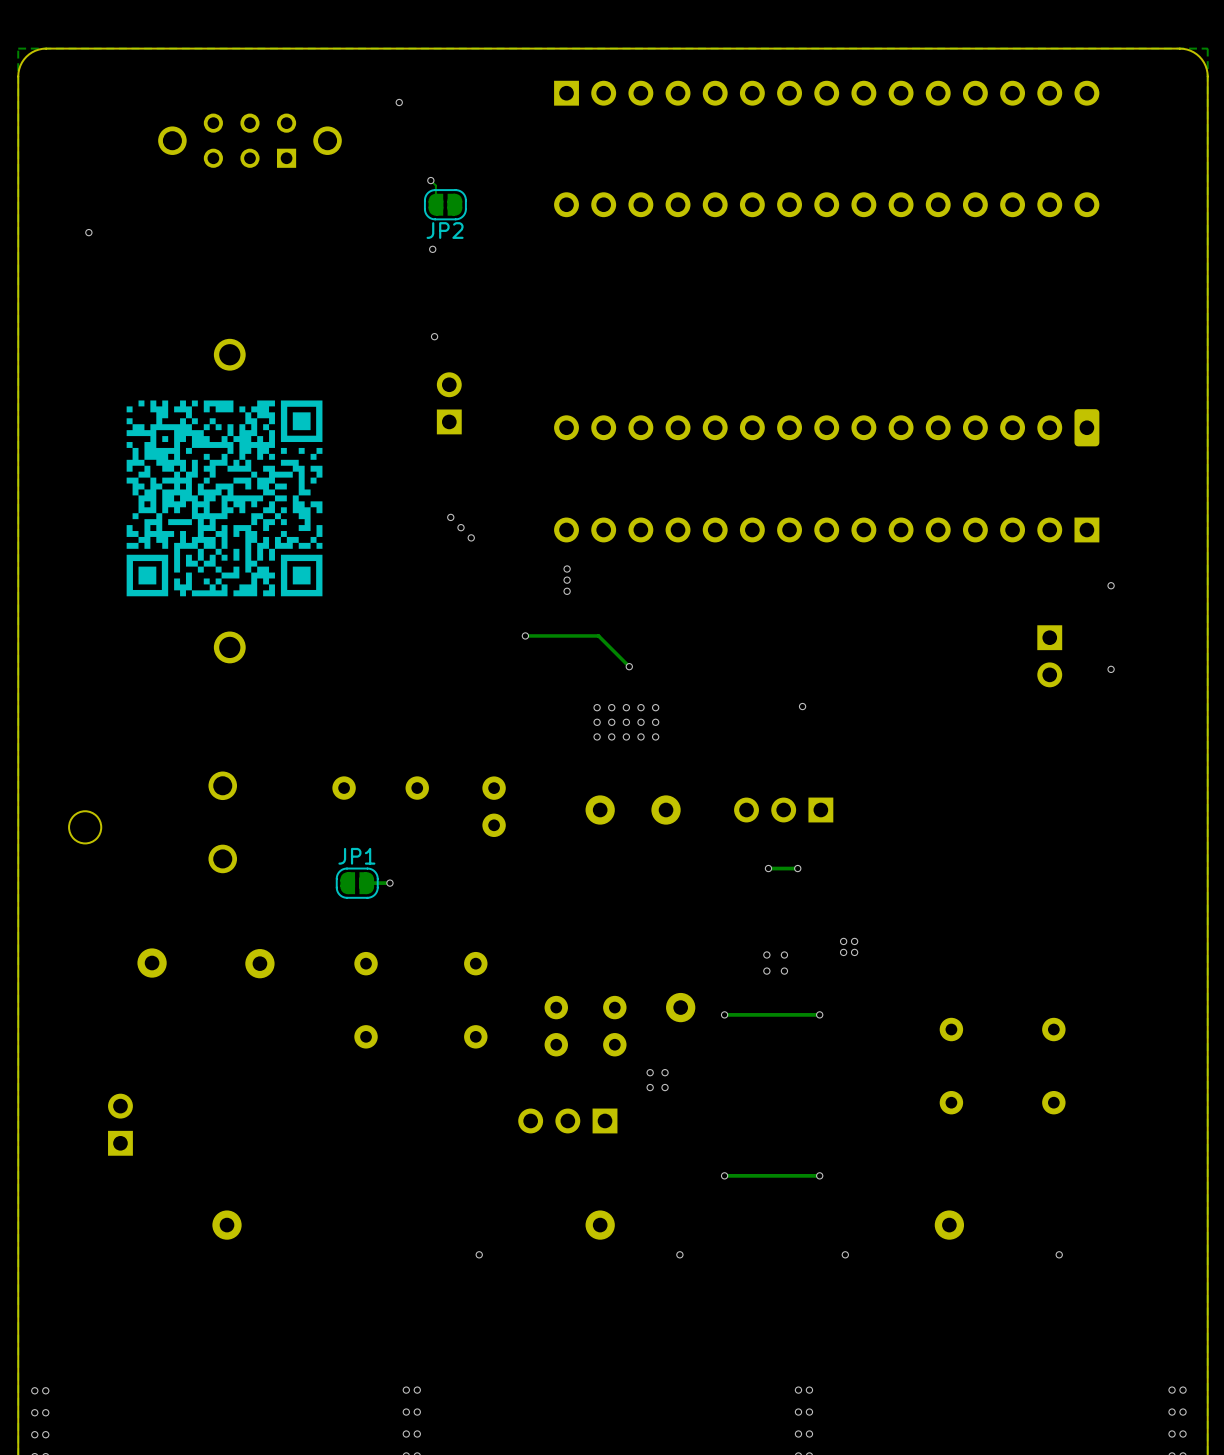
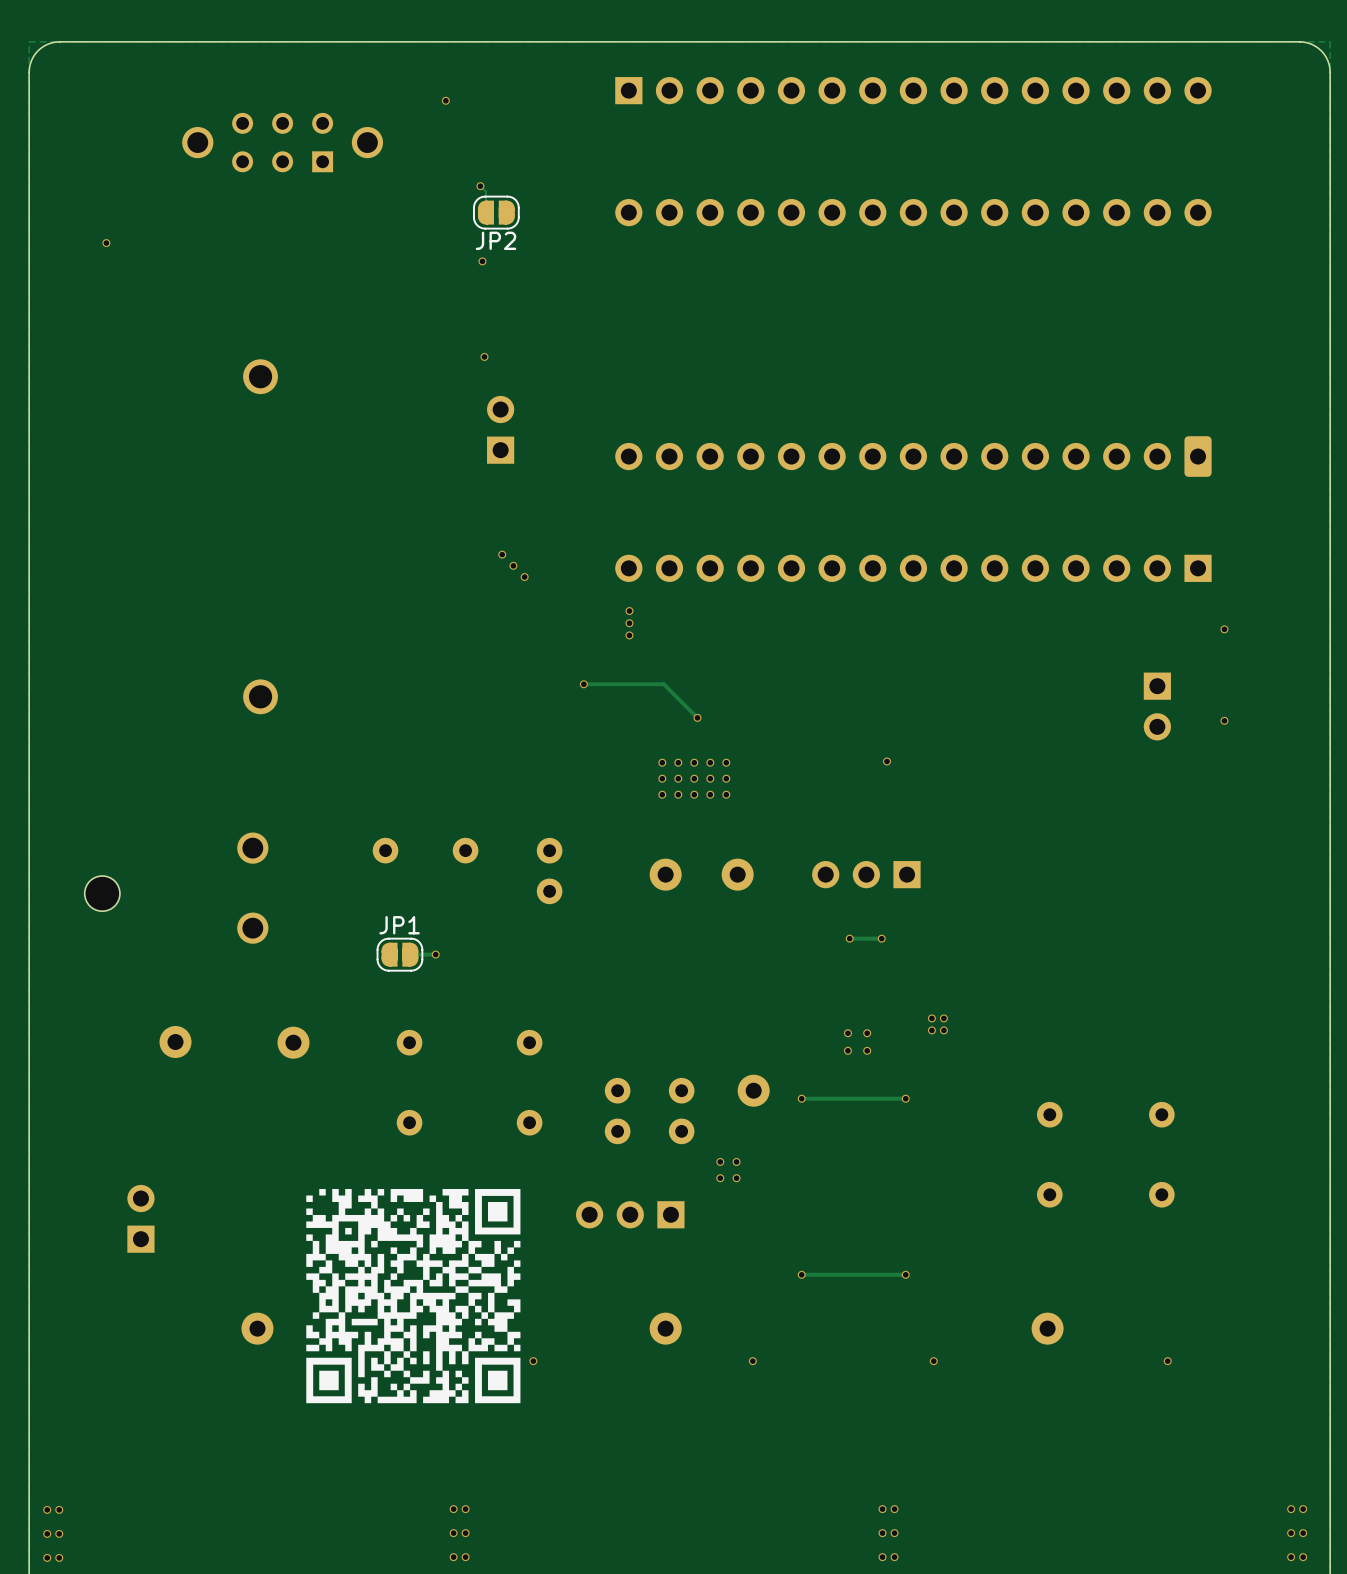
drawing: [126, 400, 323, 597] -> none
drawing: none -> [306, 1189, 521, 1404]

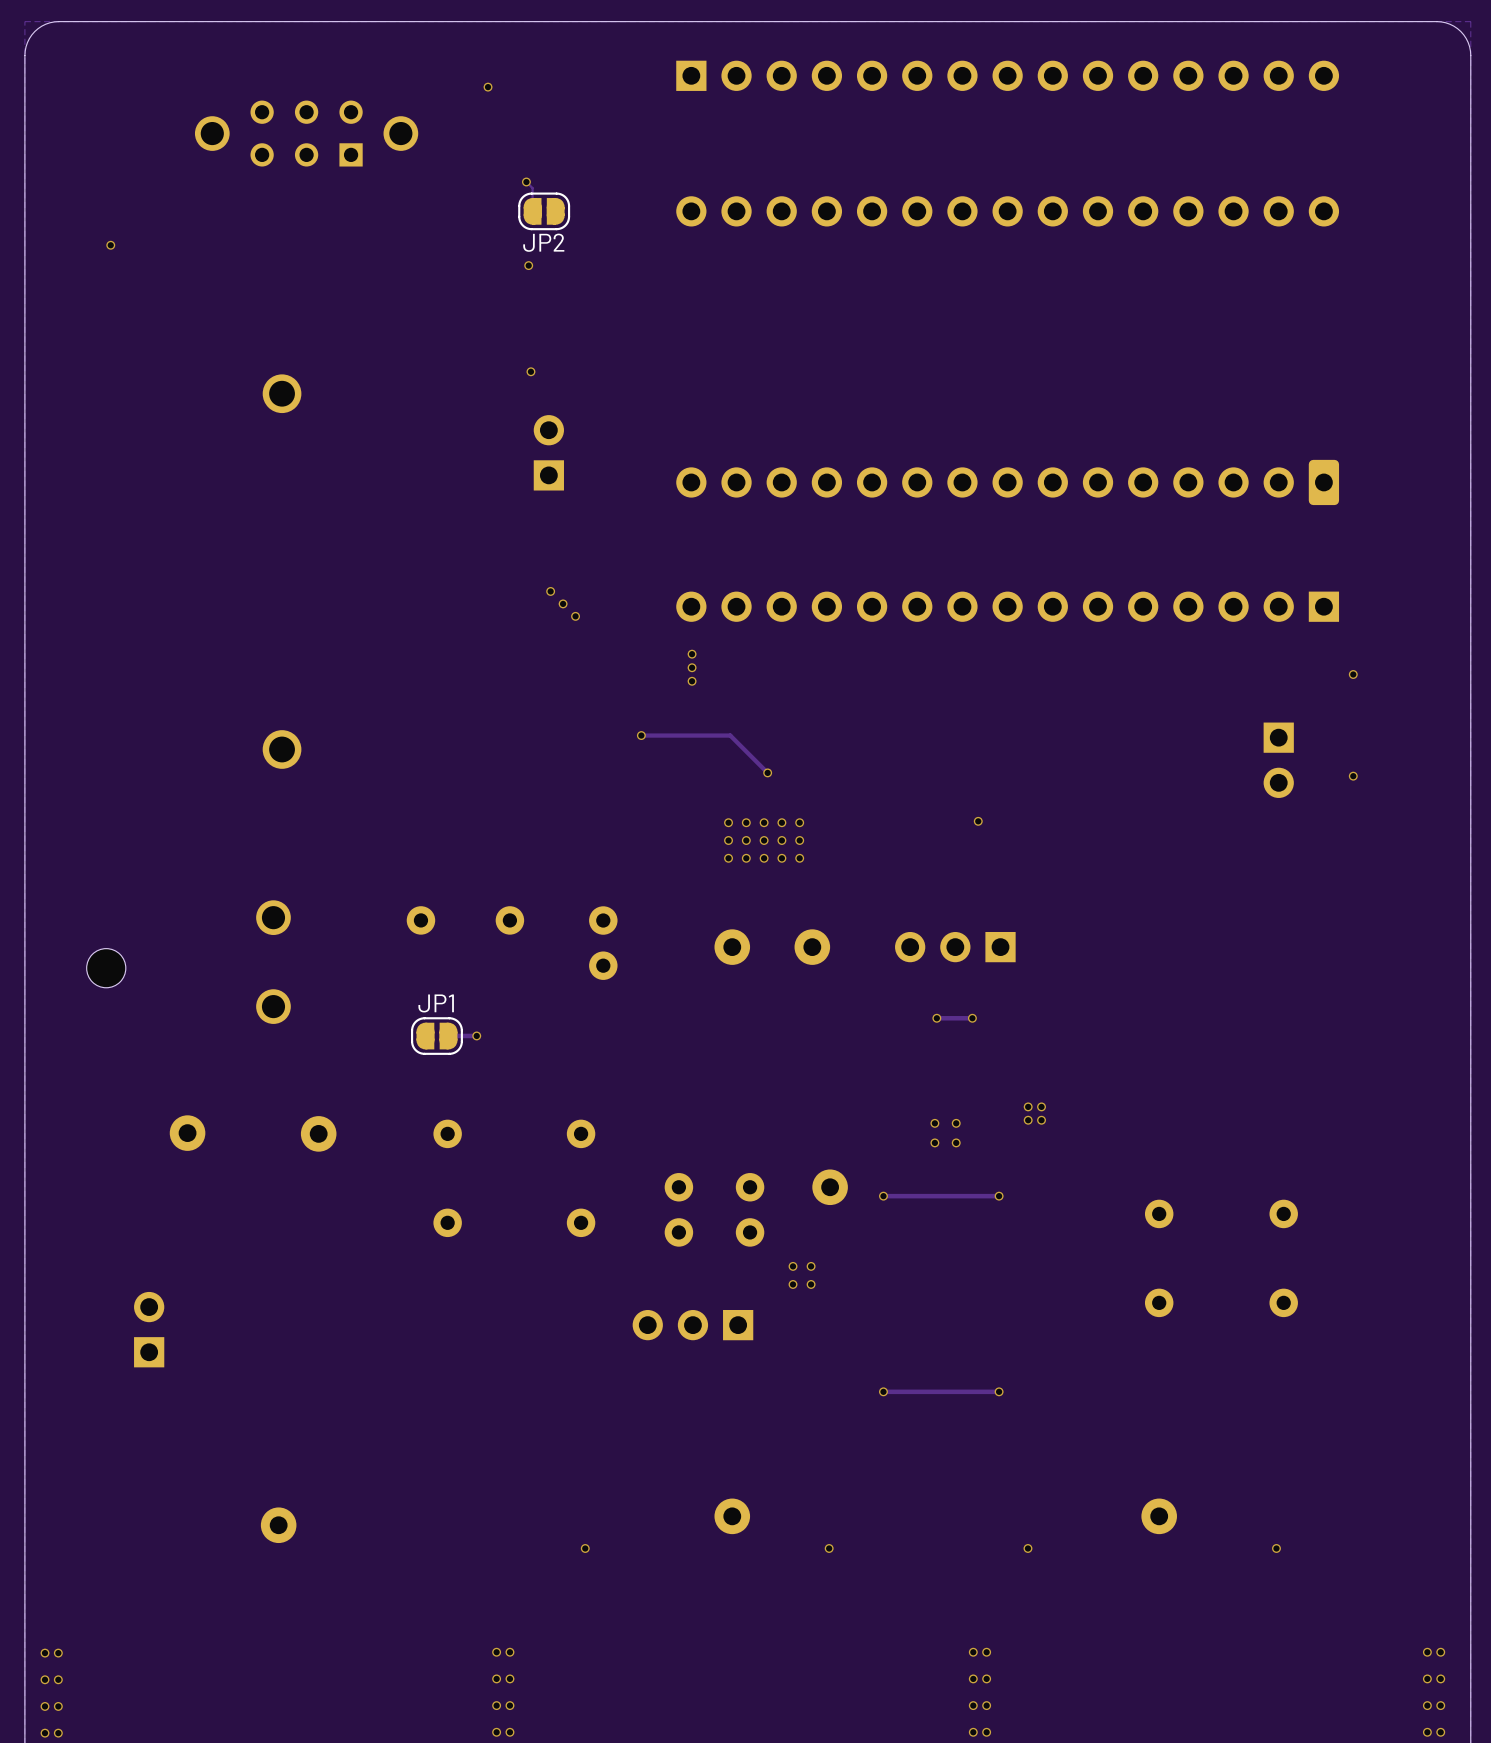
drawing: [306, 1189, 521, 1404] -> none
part position: (257, 1328) -> (278, 1525)
part position: (665, 1328) -> (732, 1516)
part position: (1047, 1328) -> (1159, 1516)
via position: (533, 1361) -> (585, 1548)
via position: (752, 1361) -> (829, 1548)
via position: (933, 1361) -> (1027, 1548)
via position: (1167, 1361) -> (1276, 1548)

